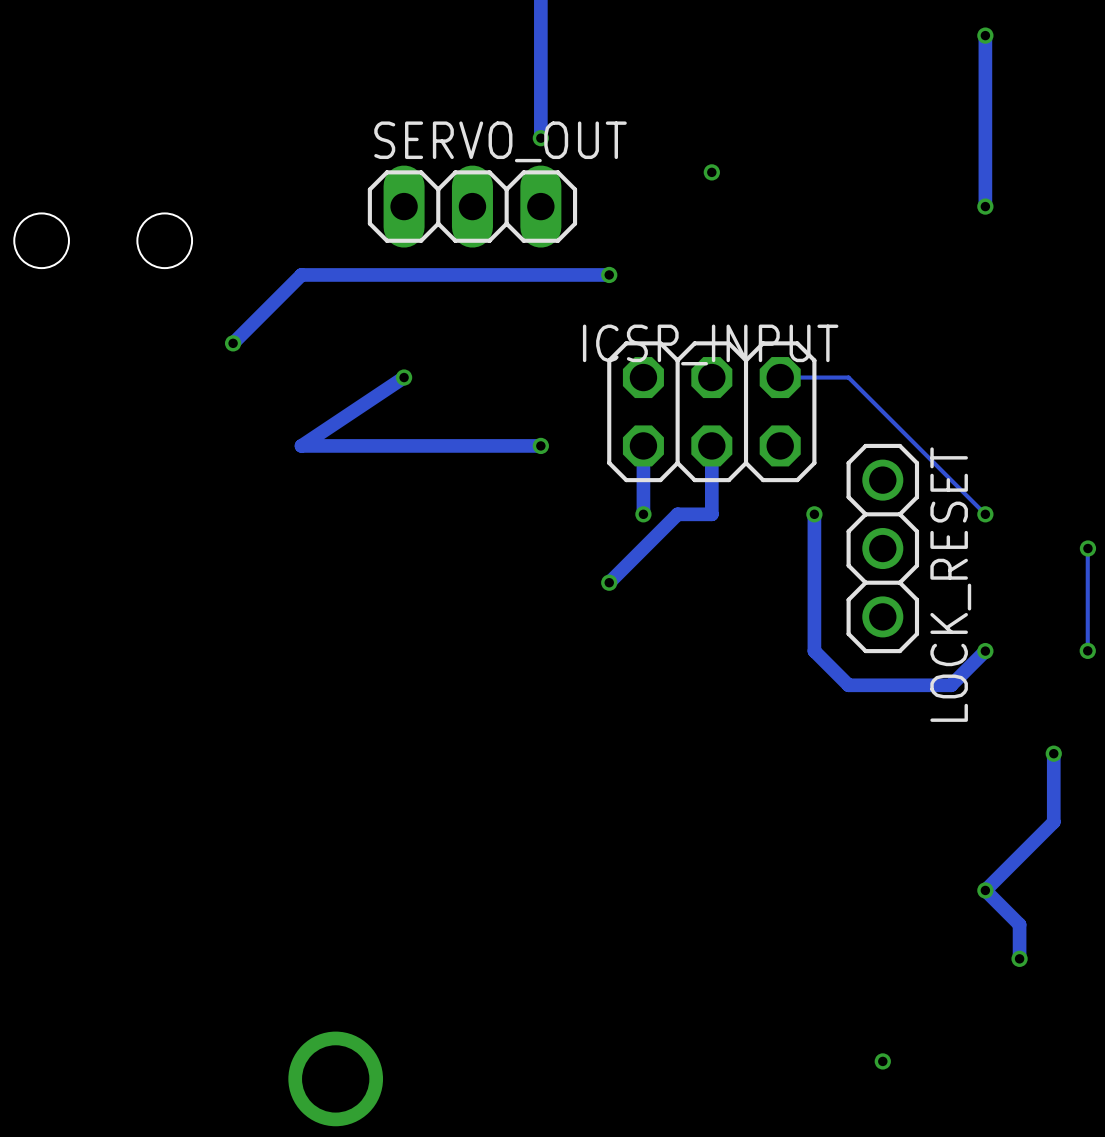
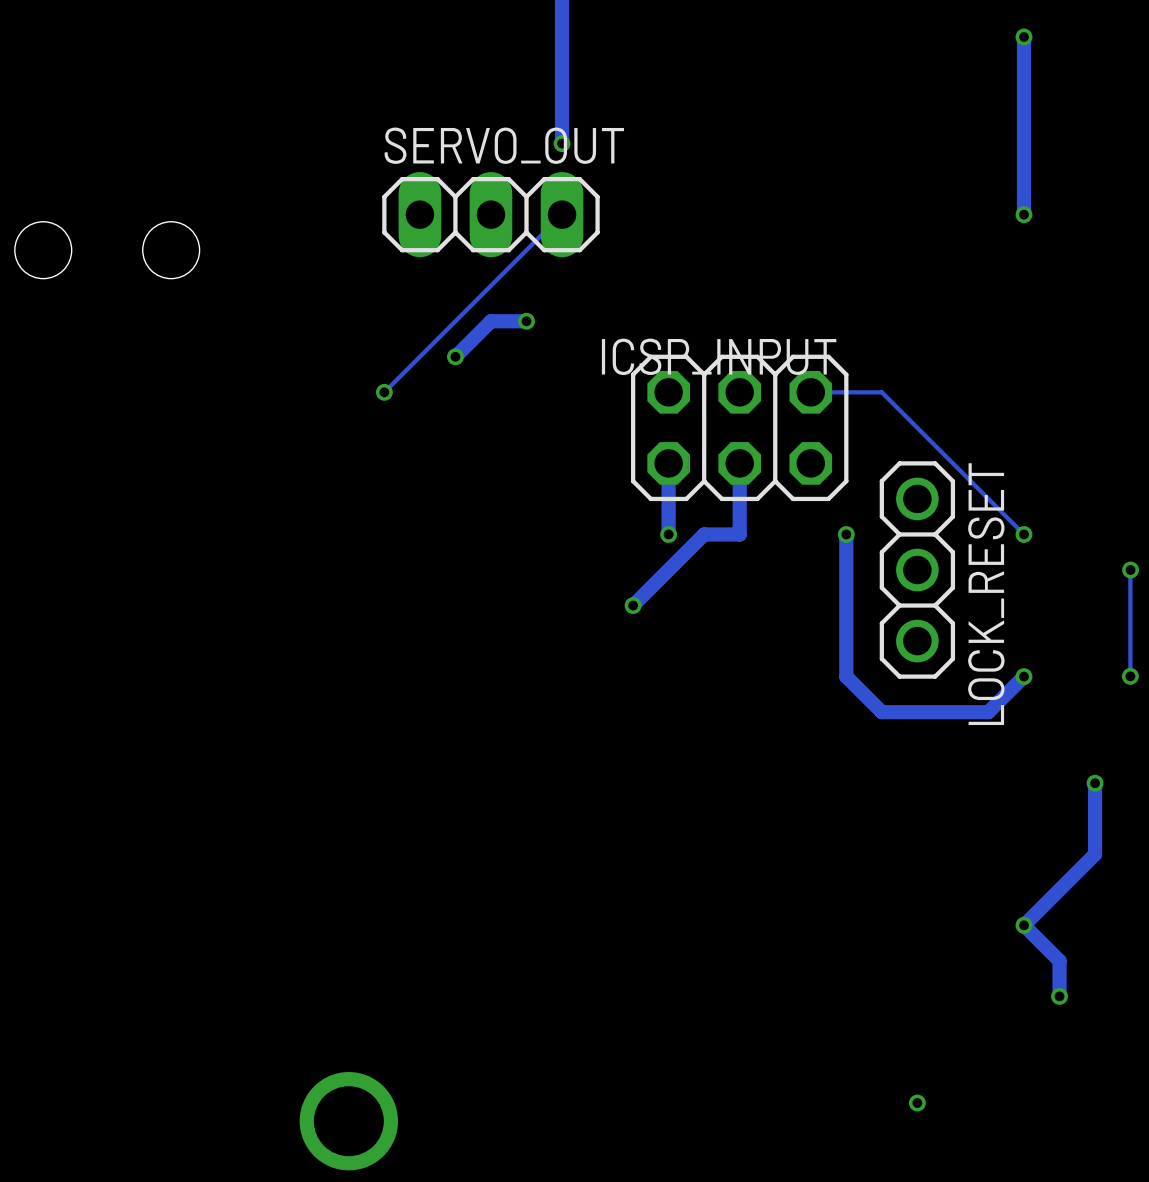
via: (711, 172) -> none
track: none -> (562, 214) (384, 392)
track: (609, 274) (301, 274) (233, 343) -> none
via: (609, 274) -> none
track: none -> (526, 321) (490, 321) (455, 356)
via: none -> (526, 321)
via: (233, 343) -> none
via: none -> (455, 356)
via: none -> (384, 392)
track: (404, 377) (301, 445) (540, 445) -> none
via: (404, 377) -> none
via: (540, 445) -> none

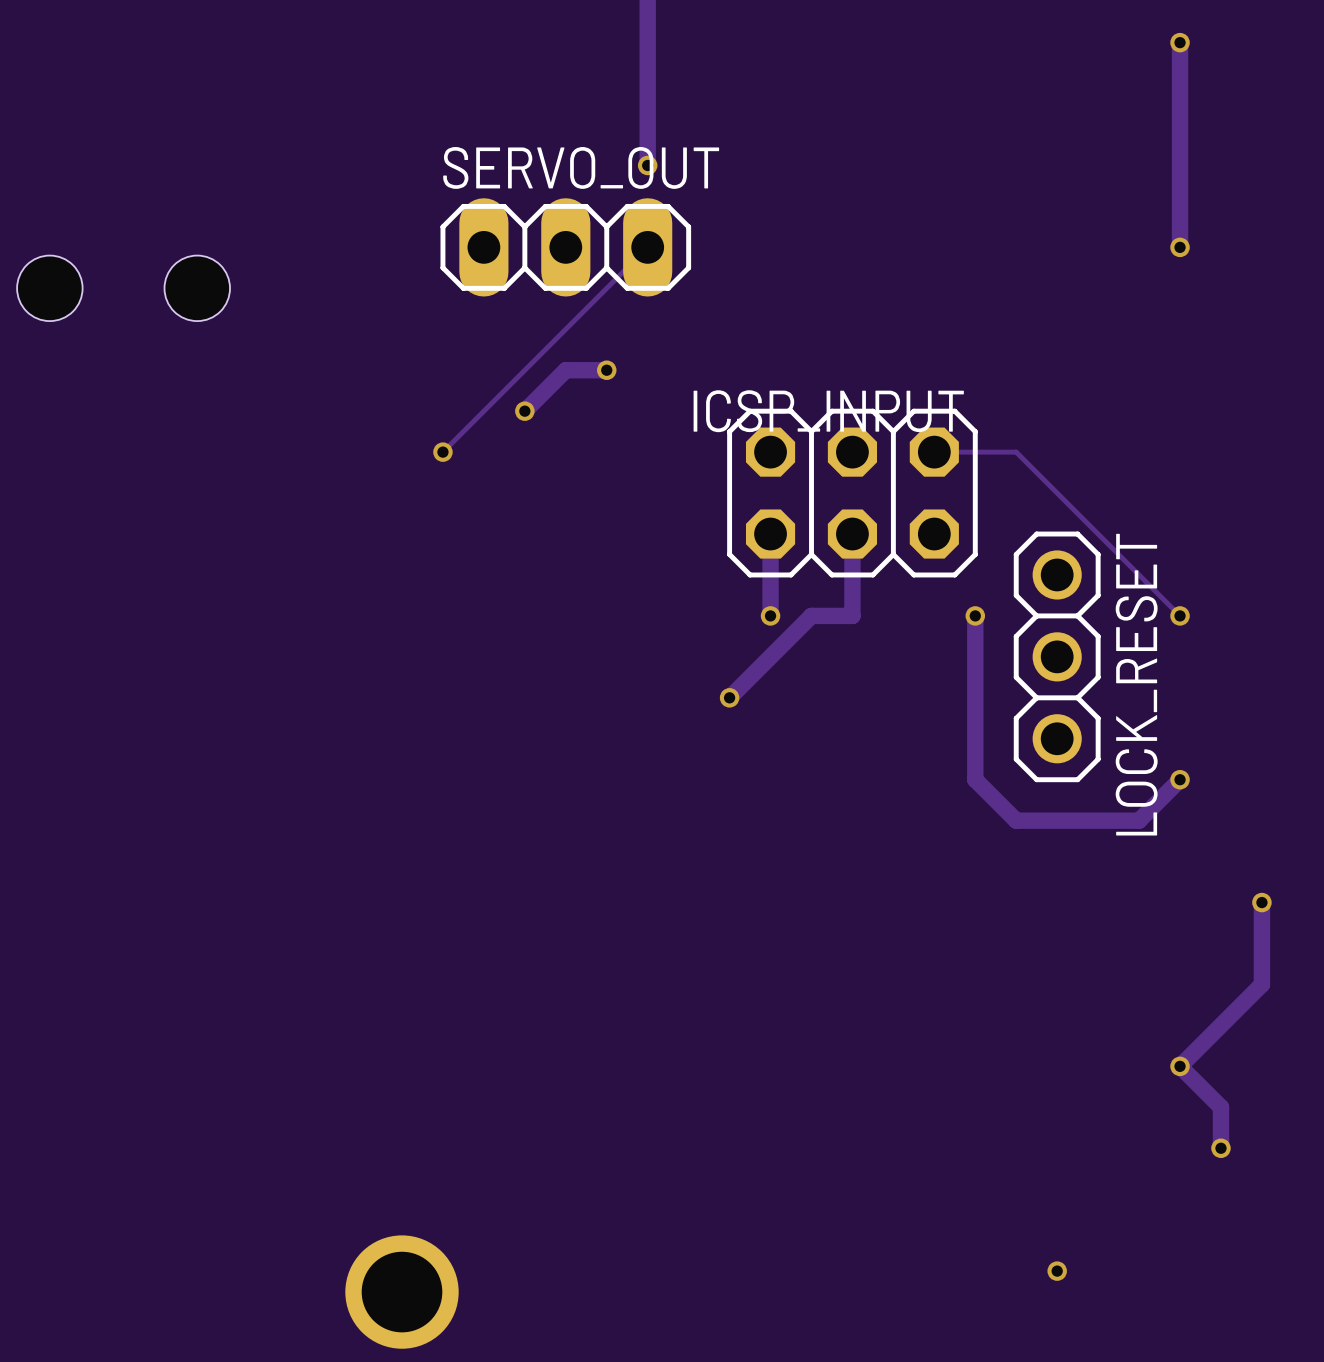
track: (1130, 570) (1130, 676) -> none
via: (1130, 570) -> none
via: (1130, 676) -> none

